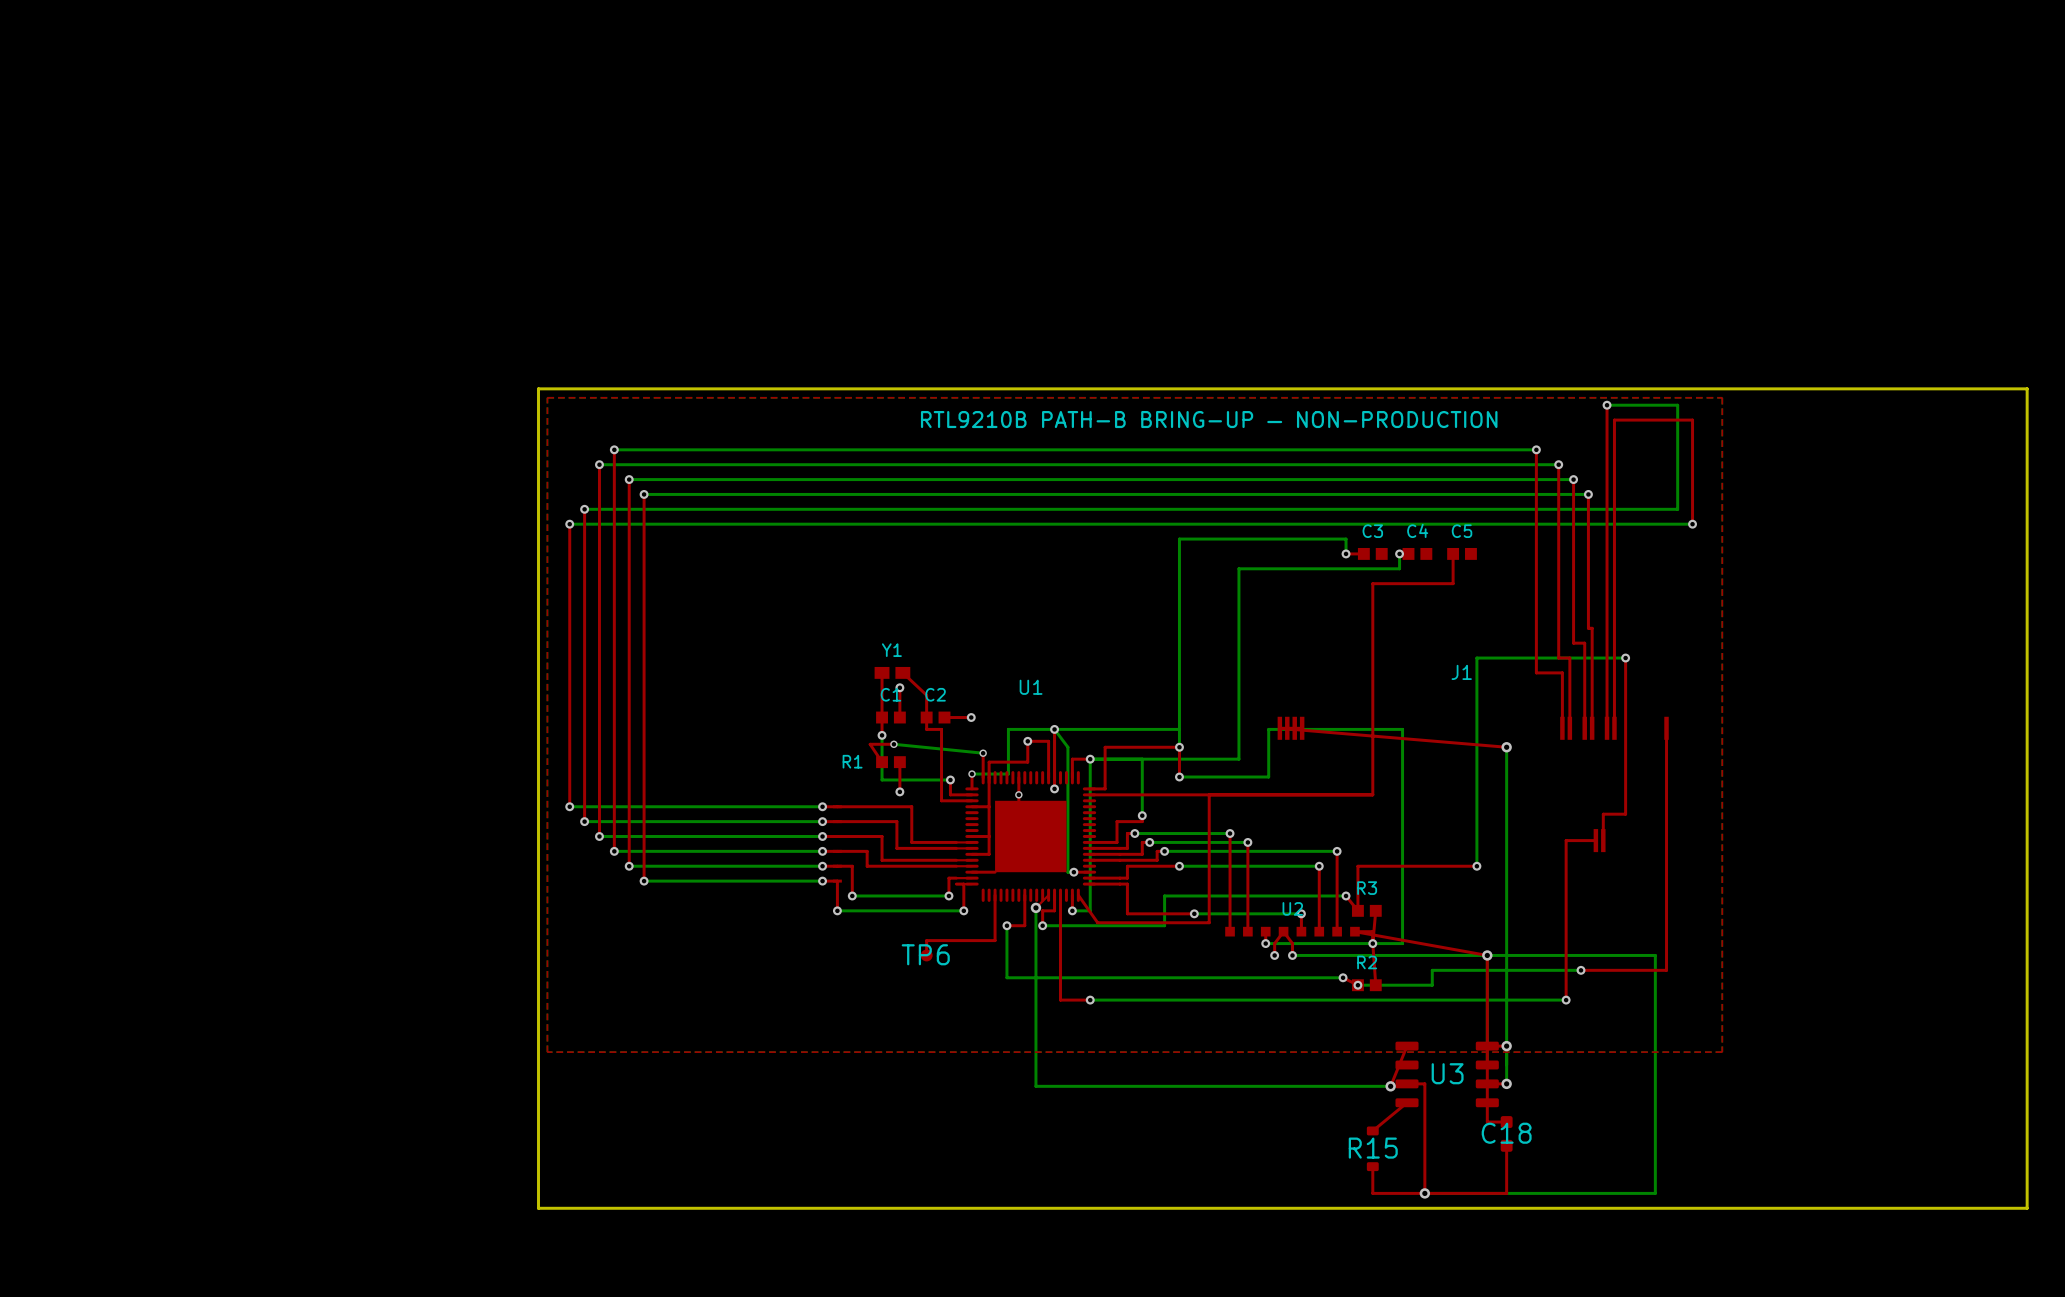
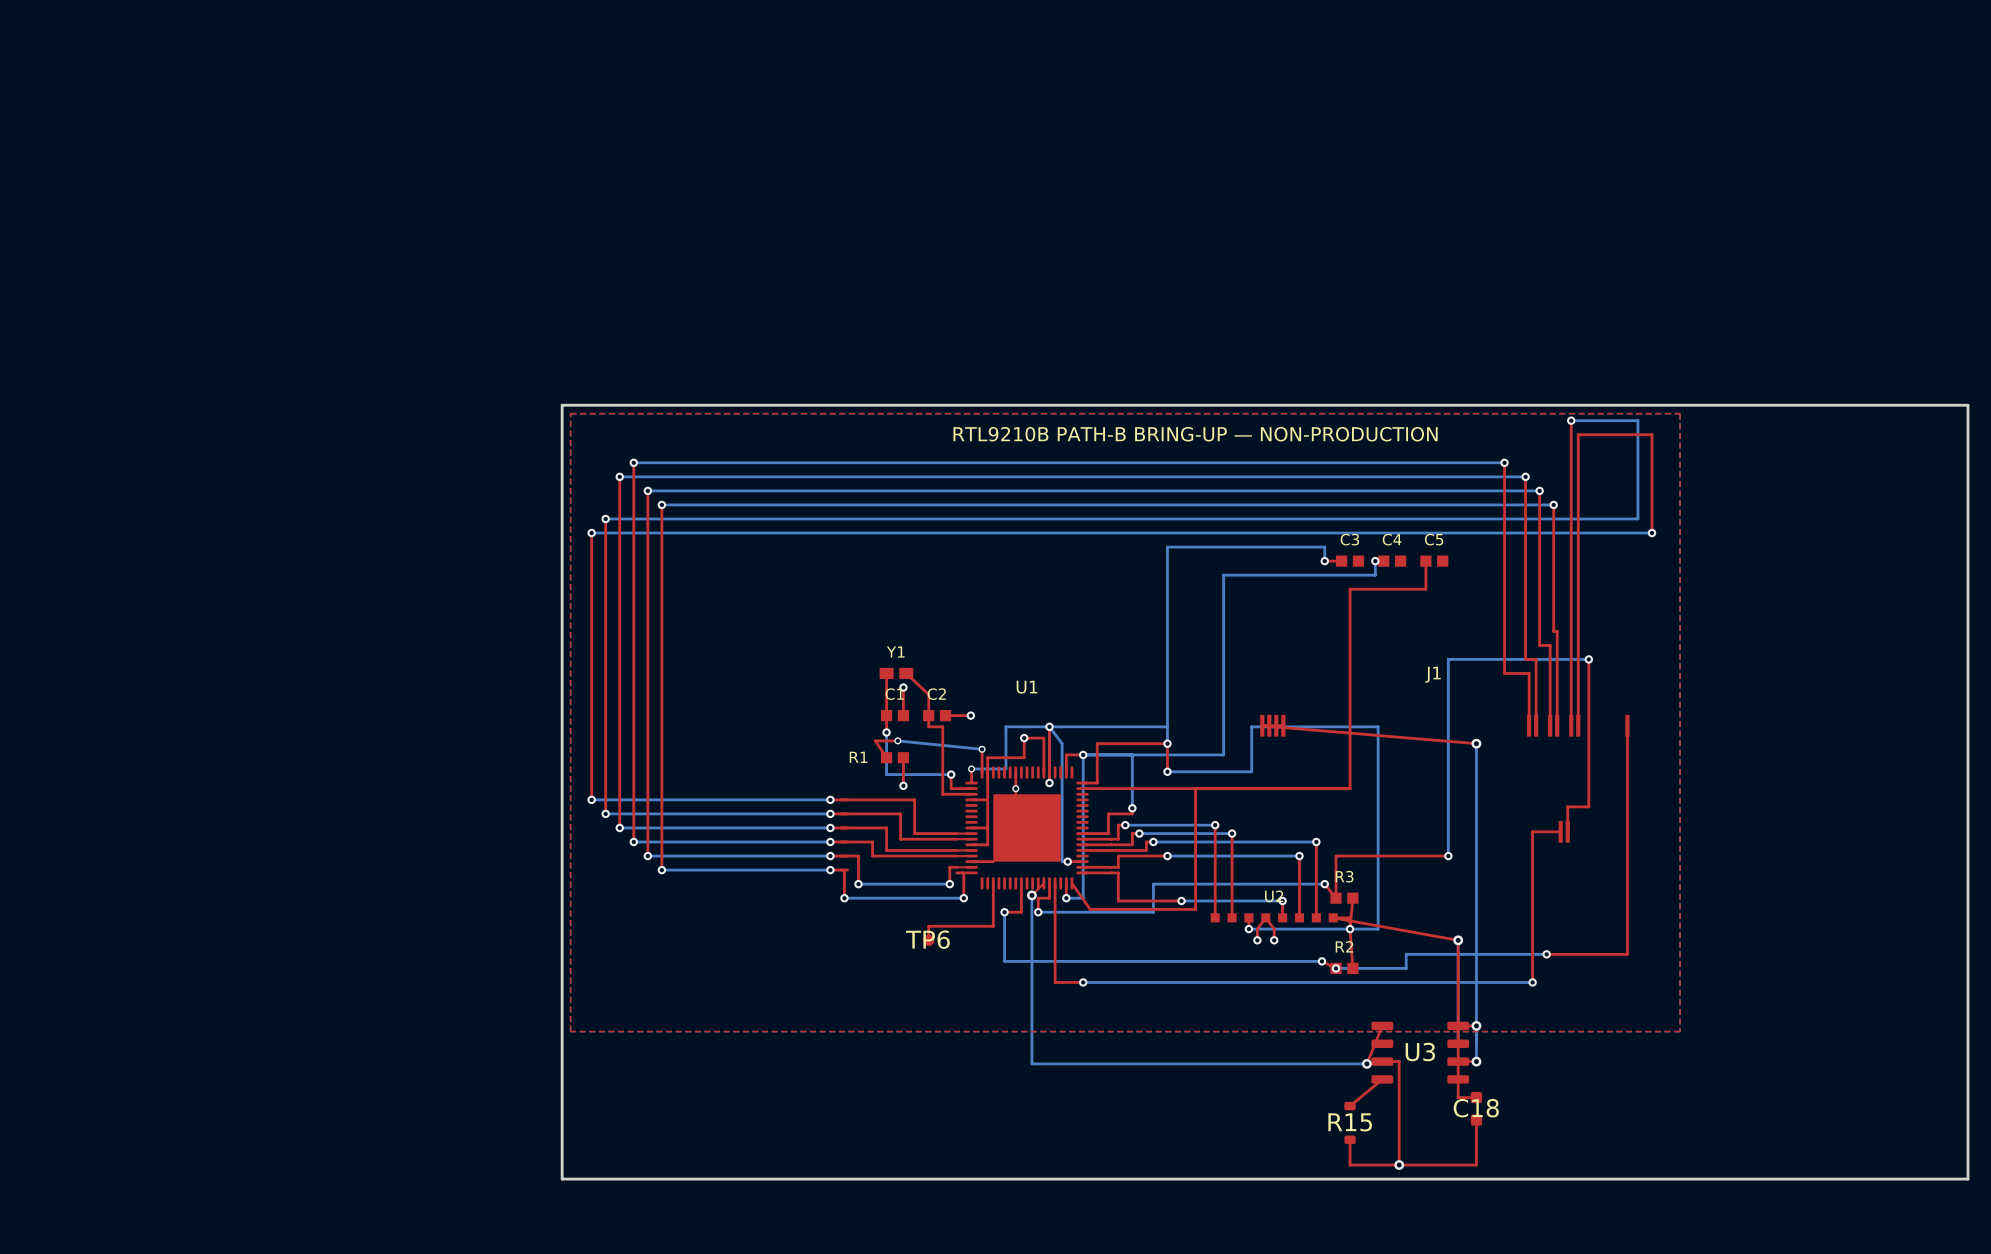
bottom track: (1292, 955) (1655, 955) (1655, 1193) (1424, 1193) -> none

